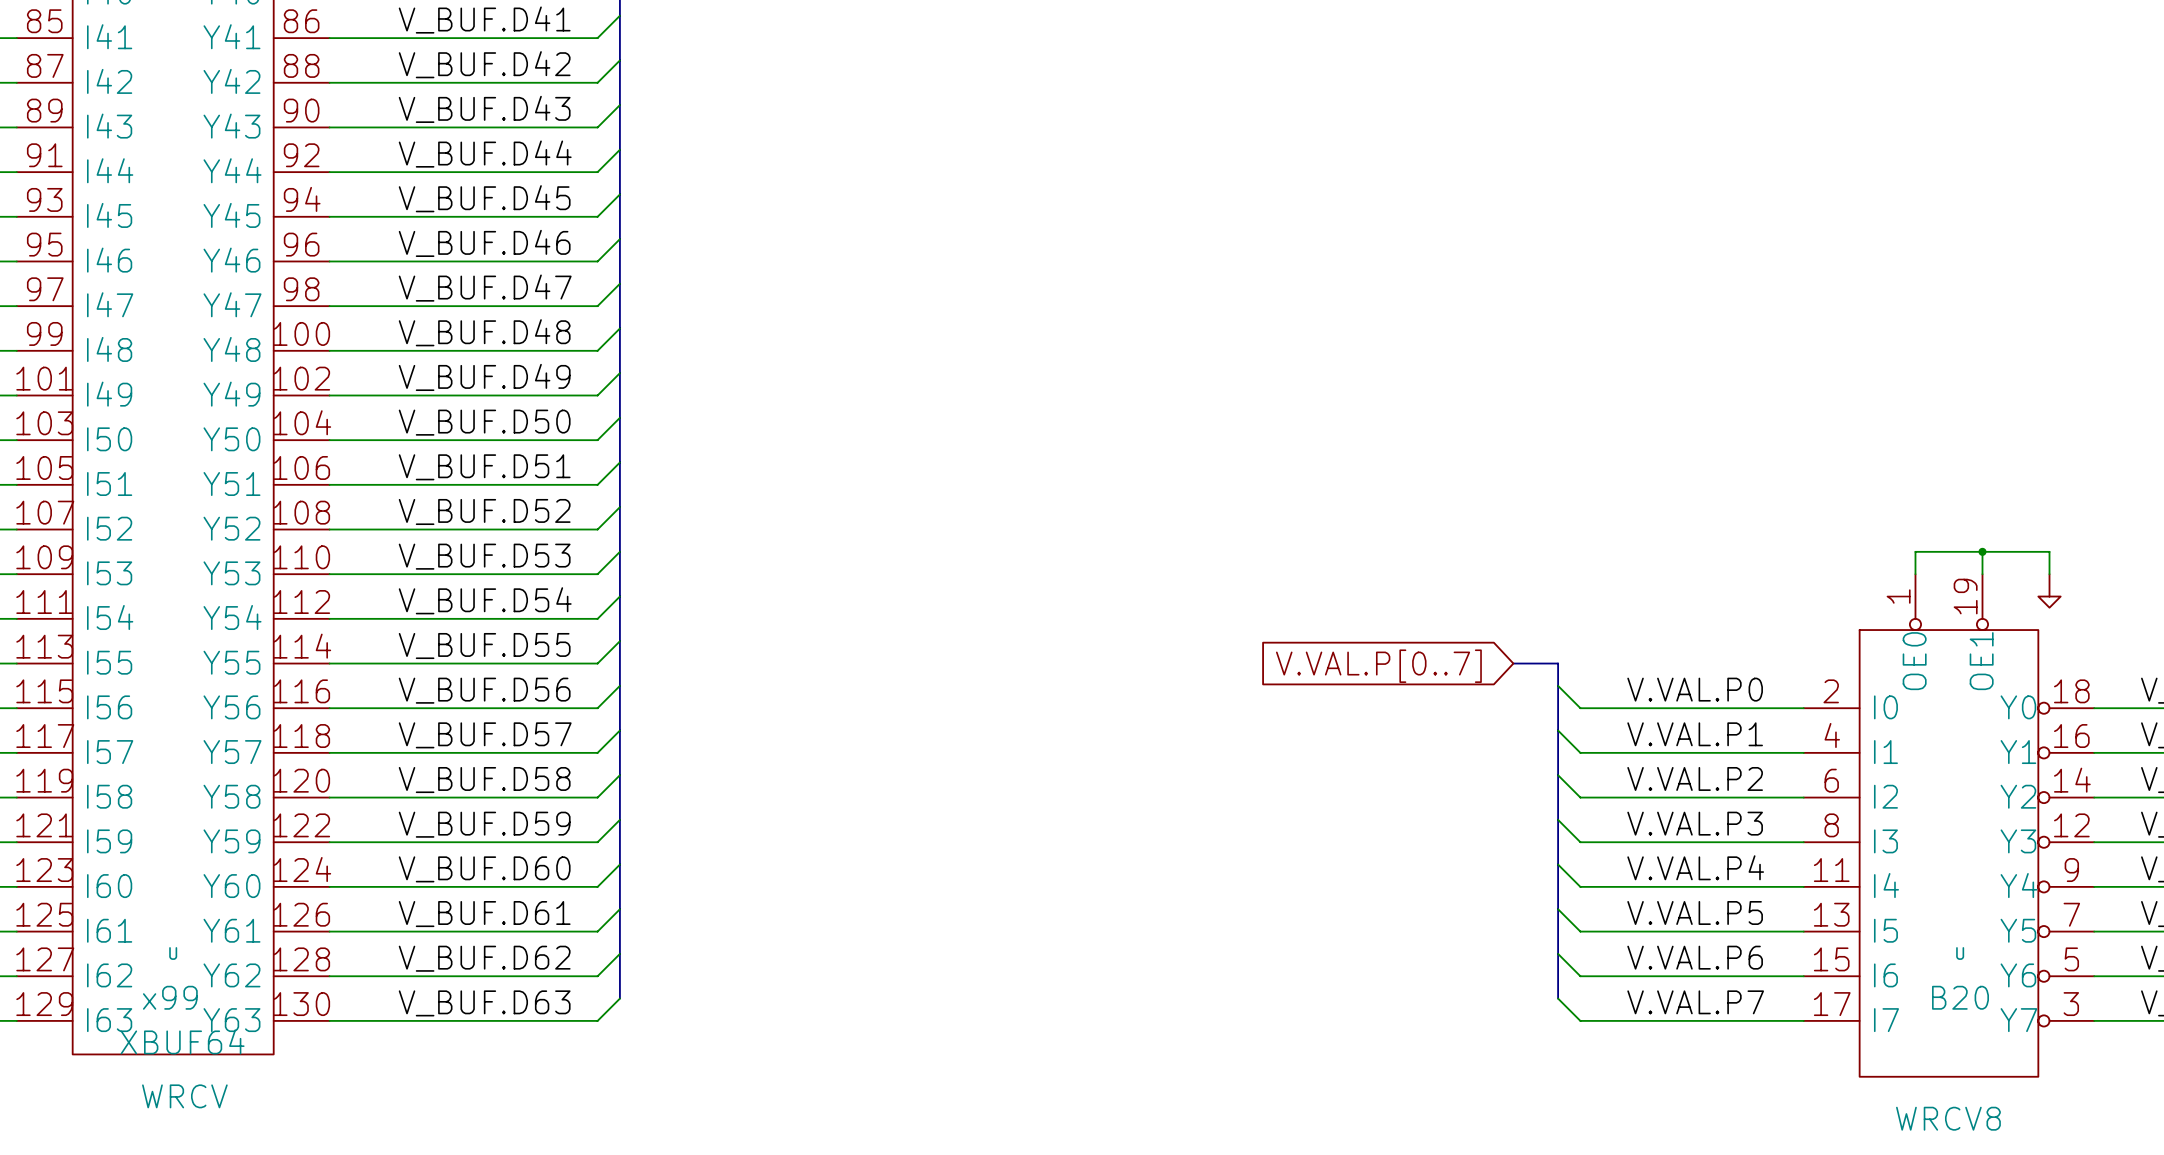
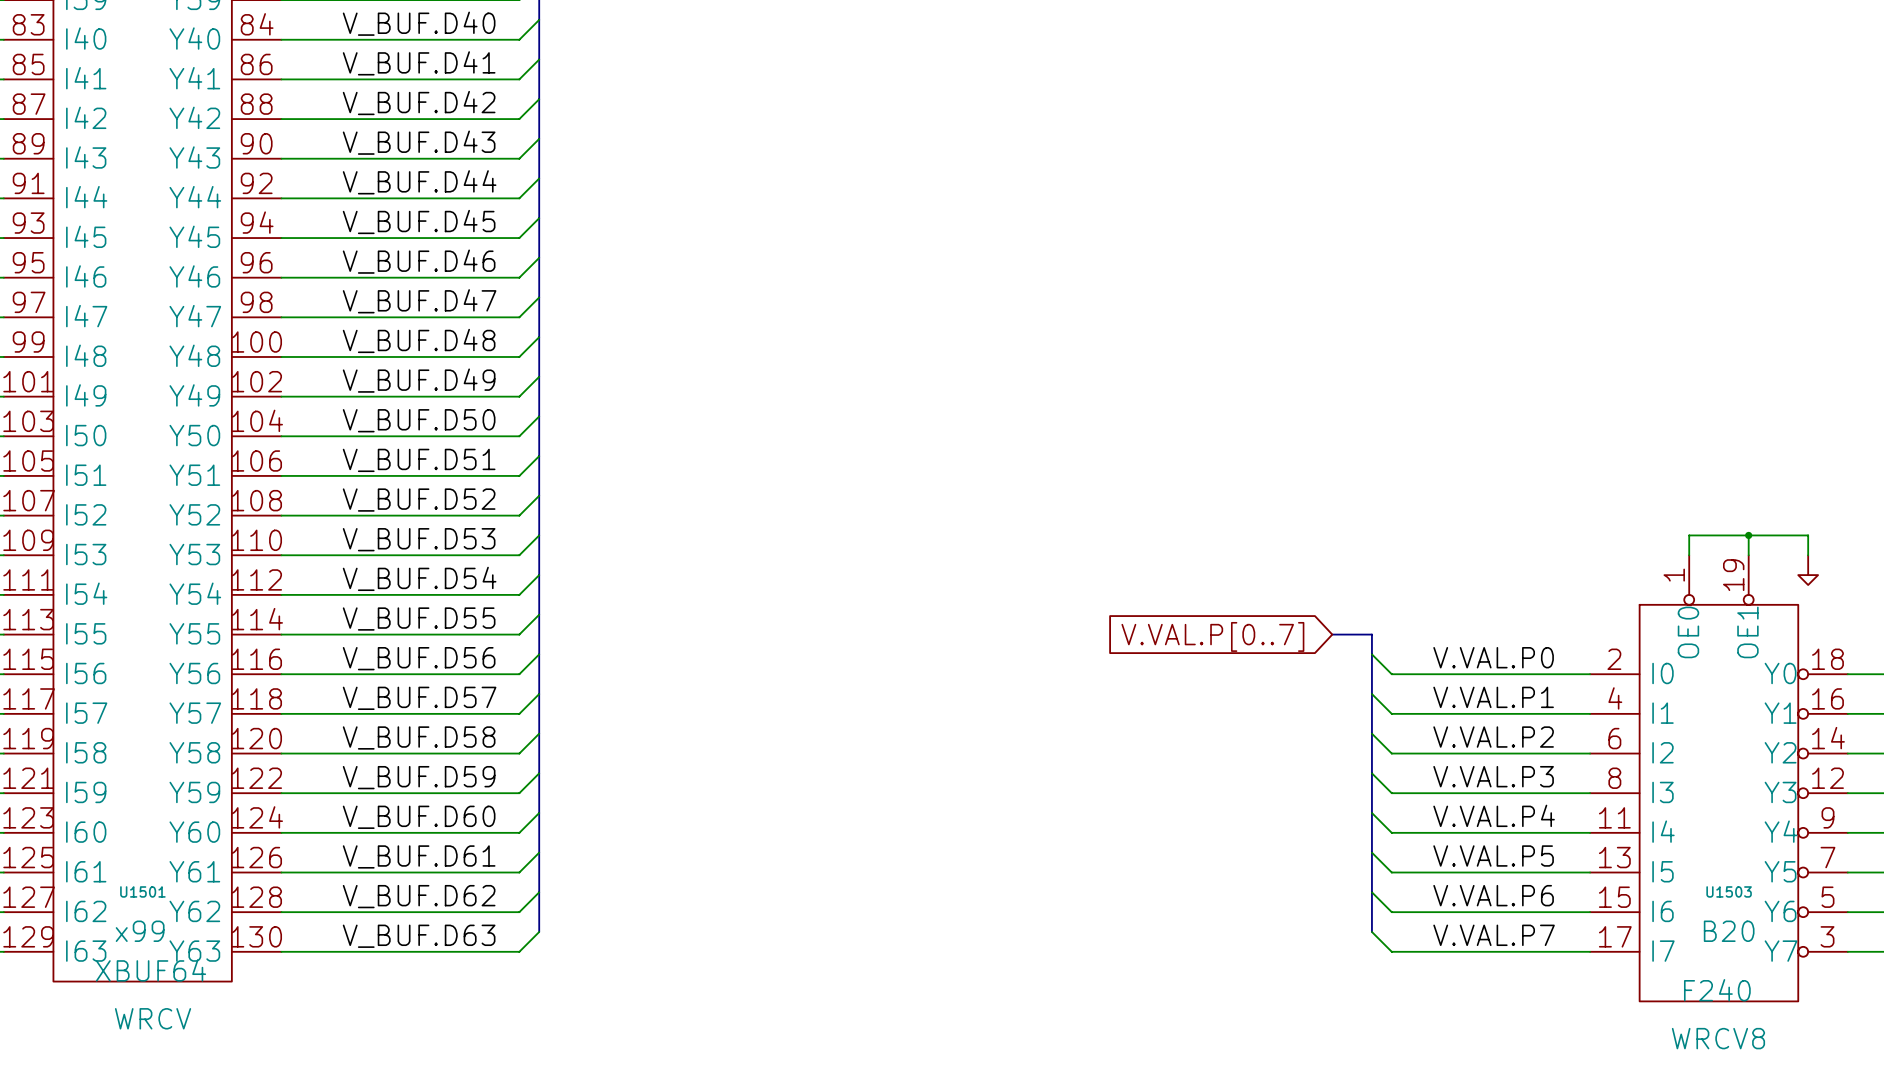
U name: U (173, 953) -> U1501 (142, 891)
U name: U (1960, 953) -> U1503 (1729, 891)
U value: none -> F240 (1717, 990)

